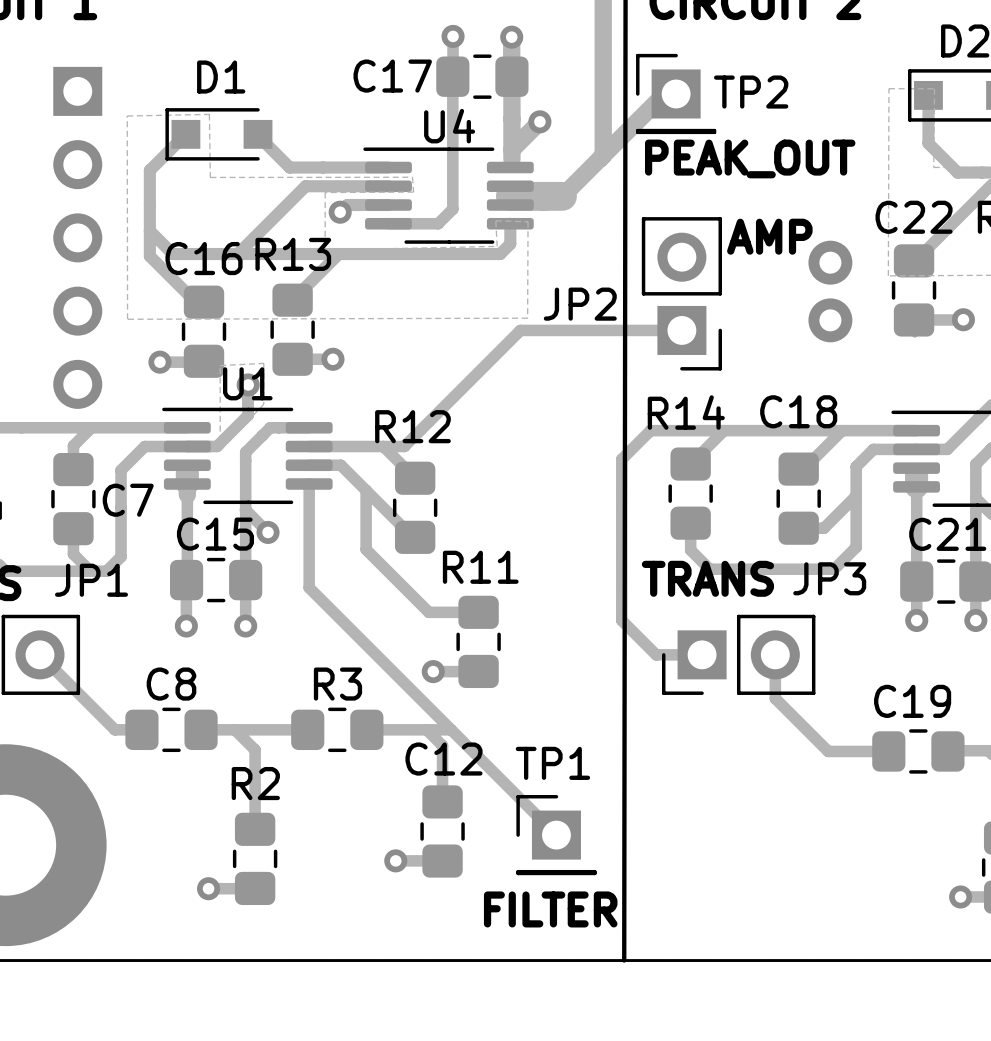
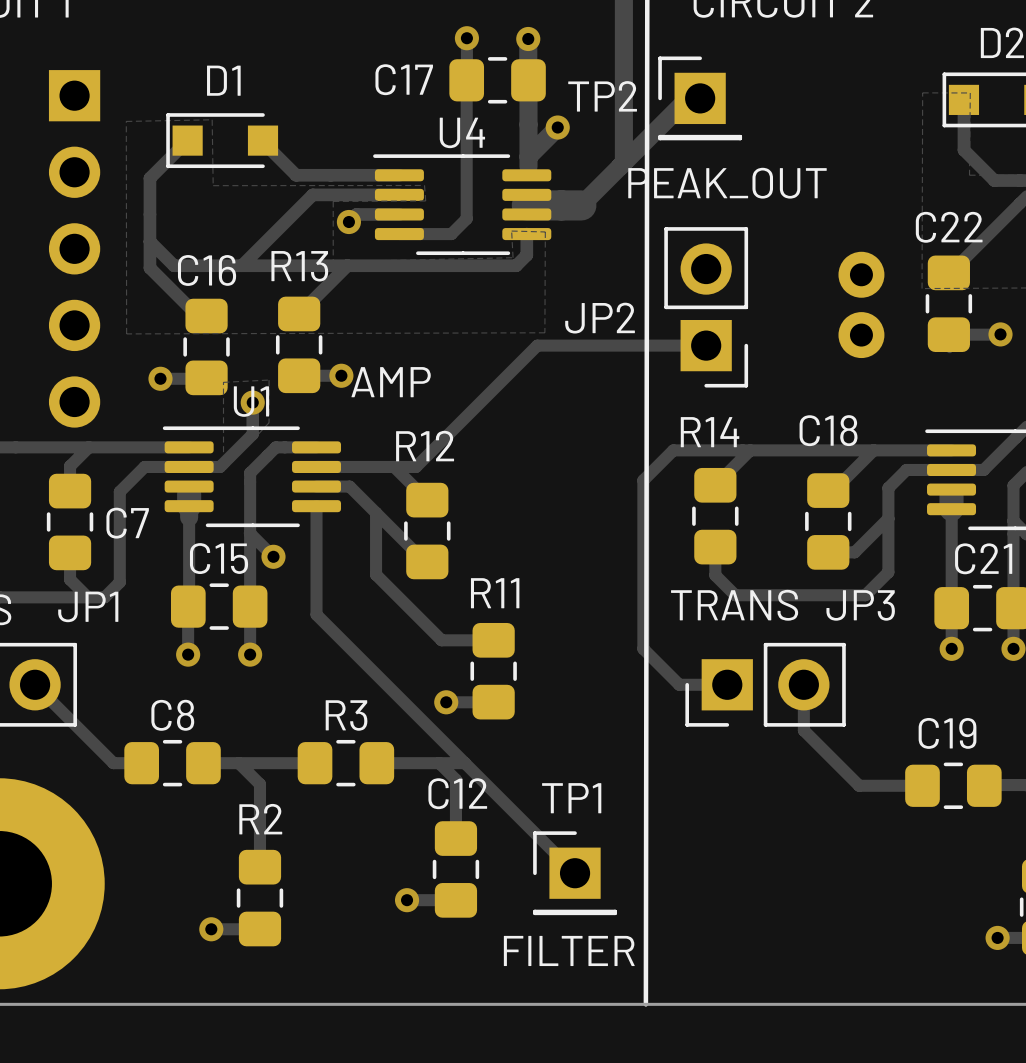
TP2 name position: TP2 (751, 92) -> TP2 (602, 96)
text position: PEAK_OUT (750, 158) -> PEAK_OUT (727, 183)
text position: AMP (769, 236) -> AMP (391, 382)

